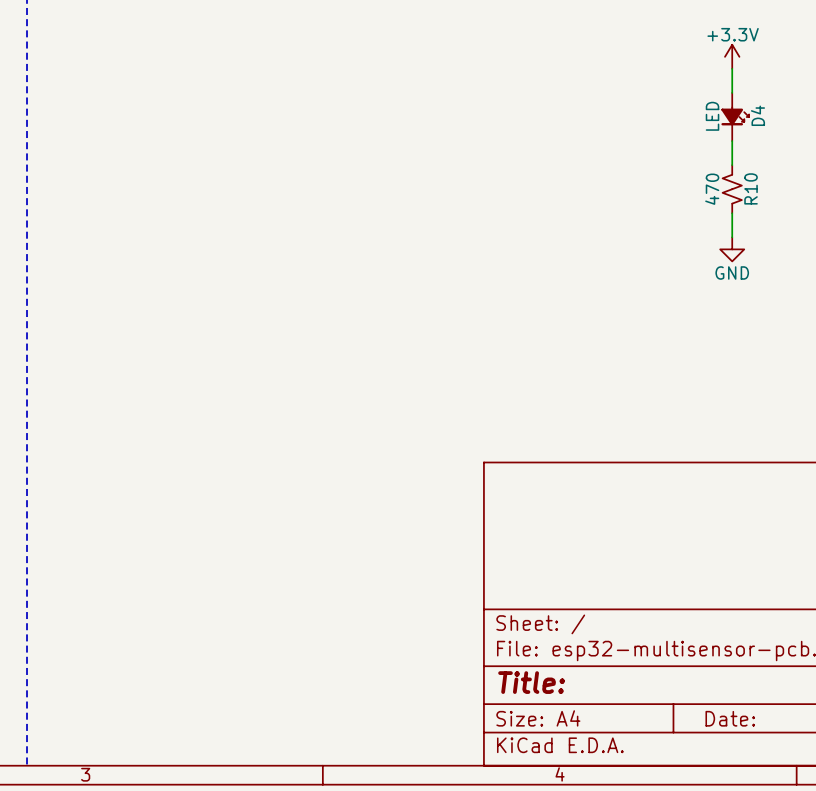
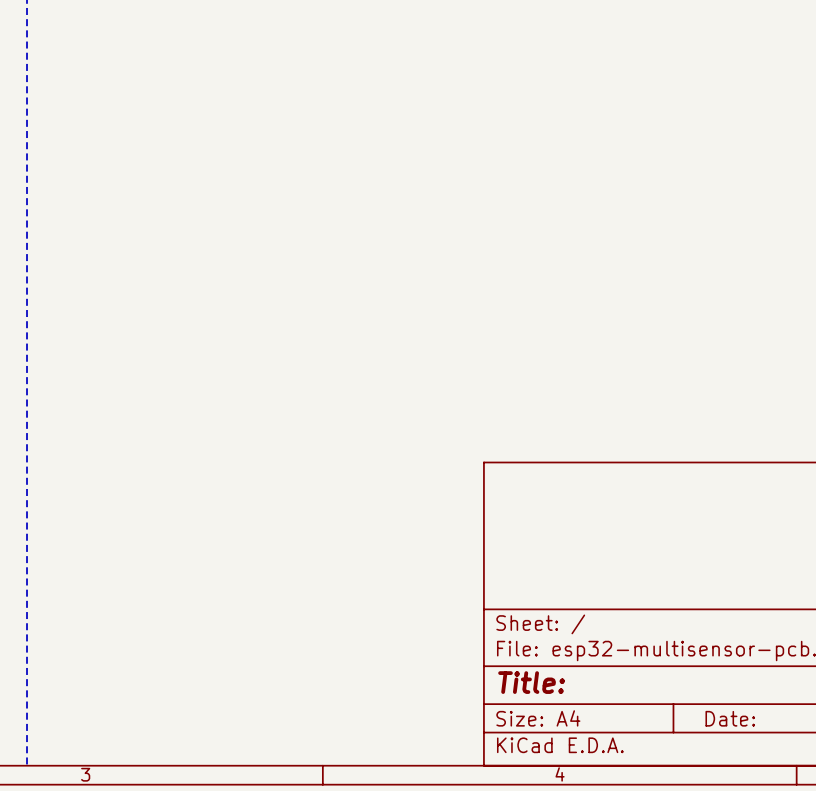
power symbol: +3.3V (732, 56) -> none
wire: (732, 68) (732, 92) -> none
D4: LED (735, 117) -> none
wire: (732, 141) (732, 165) -> none
R10: 470 (732, 189) -> none
wire: (732, 213) (732, 237) -> none
power symbol: GND (732, 249) -> none

